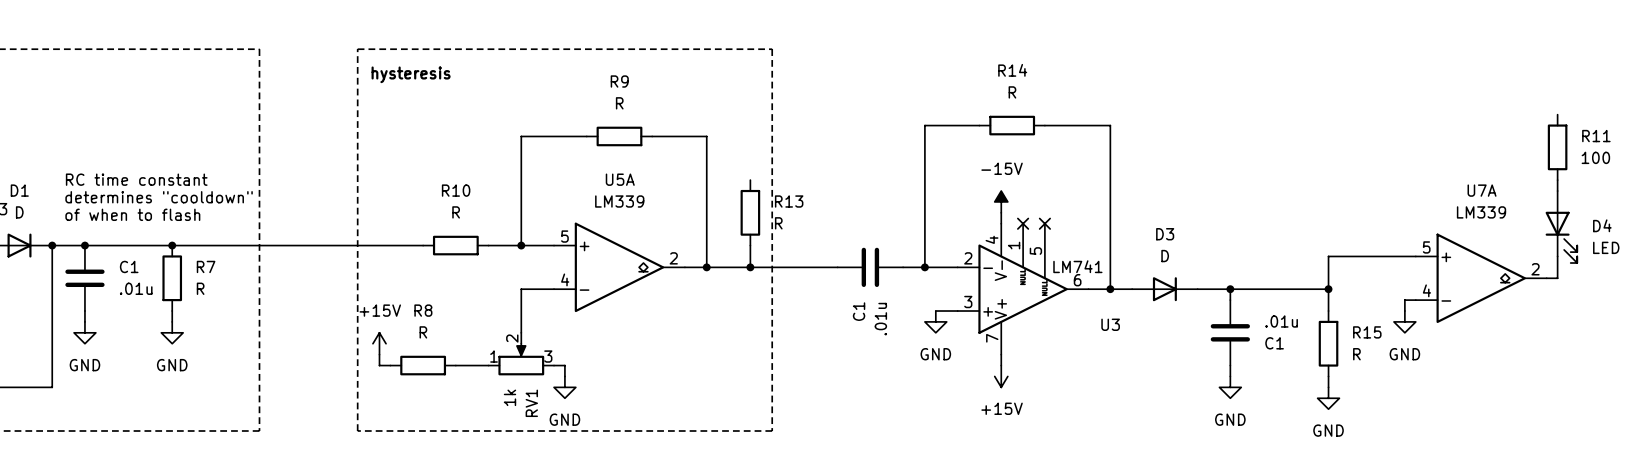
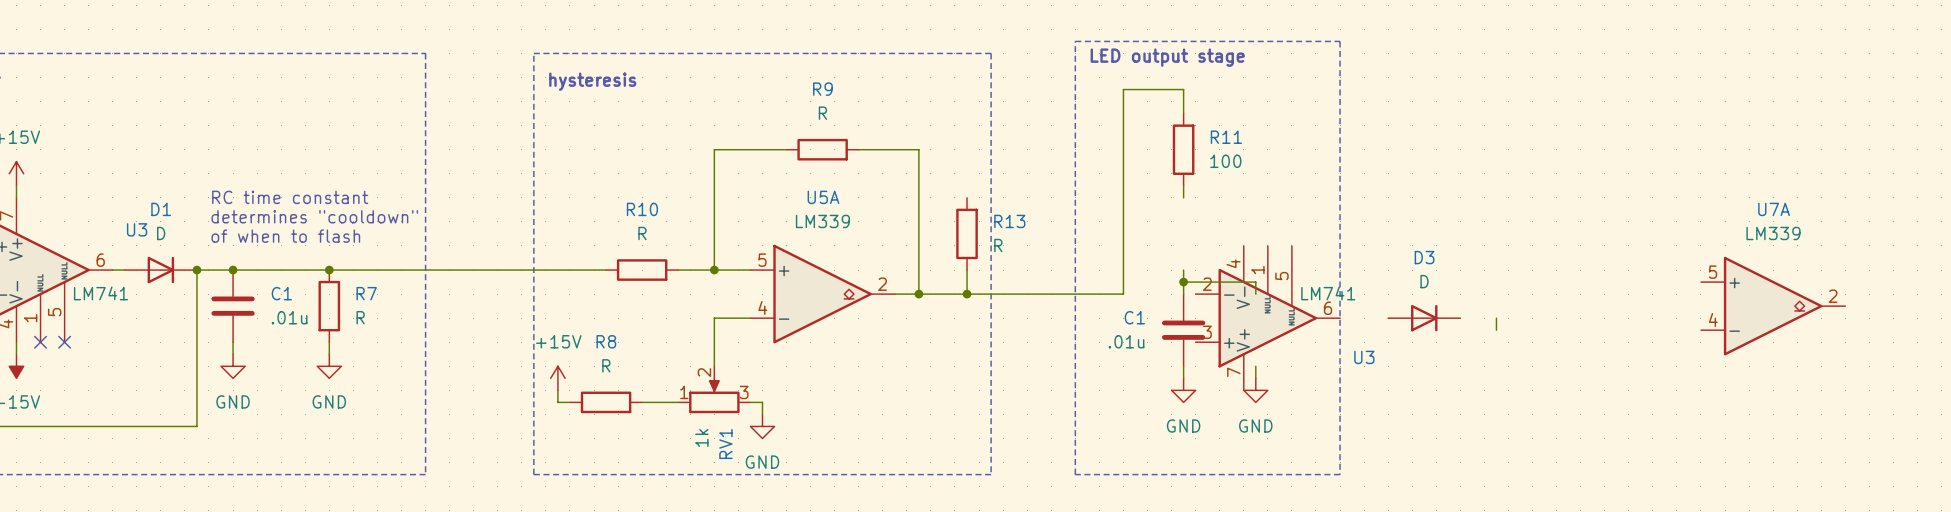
line: none -> (1075, 41) (1340, 41) (1340, 474) (1075, 474) (1075, 41)
text: none -> LED output stage (1167, 57)
wire: none -> (1183, 113) (1183, 89) (1123, 89) (1123, 294) (1063, 294)
wire: (979, 125) (924, 125) (924, 267) -> none
R14: R (1012, 125) -> none
wire: (1044, 125) (1110, 125) (1110, 289) -> none
R11 position: (1557, 147) -> (1183, 149)
wire: (1557, 180) (1557, 191) -> none
power symbol: -15V (1001, 201) -> none
wire: (1001, 212) (1001, 223) -> (1183, 185) (1183, 197)
no-connect mark: (1023, 223) -> none
no-connect mark: (1044, 223) -> none
D4: LED (1561, 227) -> none
wire: none -> (1183, 270) (1183, 294)
wire: none -> (1183, 282) (1255, 282) (1255, 294)
wire: (1415, 256) (1328, 256) (1328, 311) -> none
wire: (1557, 256) (1557, 278) (1546, 278) -> none
C1 rotation: 0° (870, 267) -> 90° clockwise (1183, 330)
C1 position: (870, 267) -> (1183, 330)
wire: (903, 267) (957, 267) -> none
junction position: (924, 267) -> (1183, 282)
wire: (1088, 289) (1132, 289) -> none
junction: (1110, 289) -> none
wire: (1197, 289) (1328, 289) -> none
junction: (1230, 289) -> none
junction: (1328, 289) -> none
wire: (1415, 300) (1404, 300) (1404, 311) -> none
wire: (935, 311) (957, 311) -> none
power symbol position: GND (935, 321) -> GND (1183, 390)
power symbol: GND (1404, 321) -> none
wire: none -> (1183, 366) (1183, 378)
C1: .01u (1230, 332) -> none
R15: R (1328, 343) -> none
wire: (1001, 354) (1001, 365) -> (1255, 366) (1255, 378)
power symbol: none -> GND (1255, 390)
wire: (1230, 365) (1230, 376) -> none
power symbol: +15V (1001, 376) -> none
wire: (1328, 376) (1328, 387) -> none
power symbol: GND (1230, 387) -> none
power symbol: GND (1328, 398) -> none

